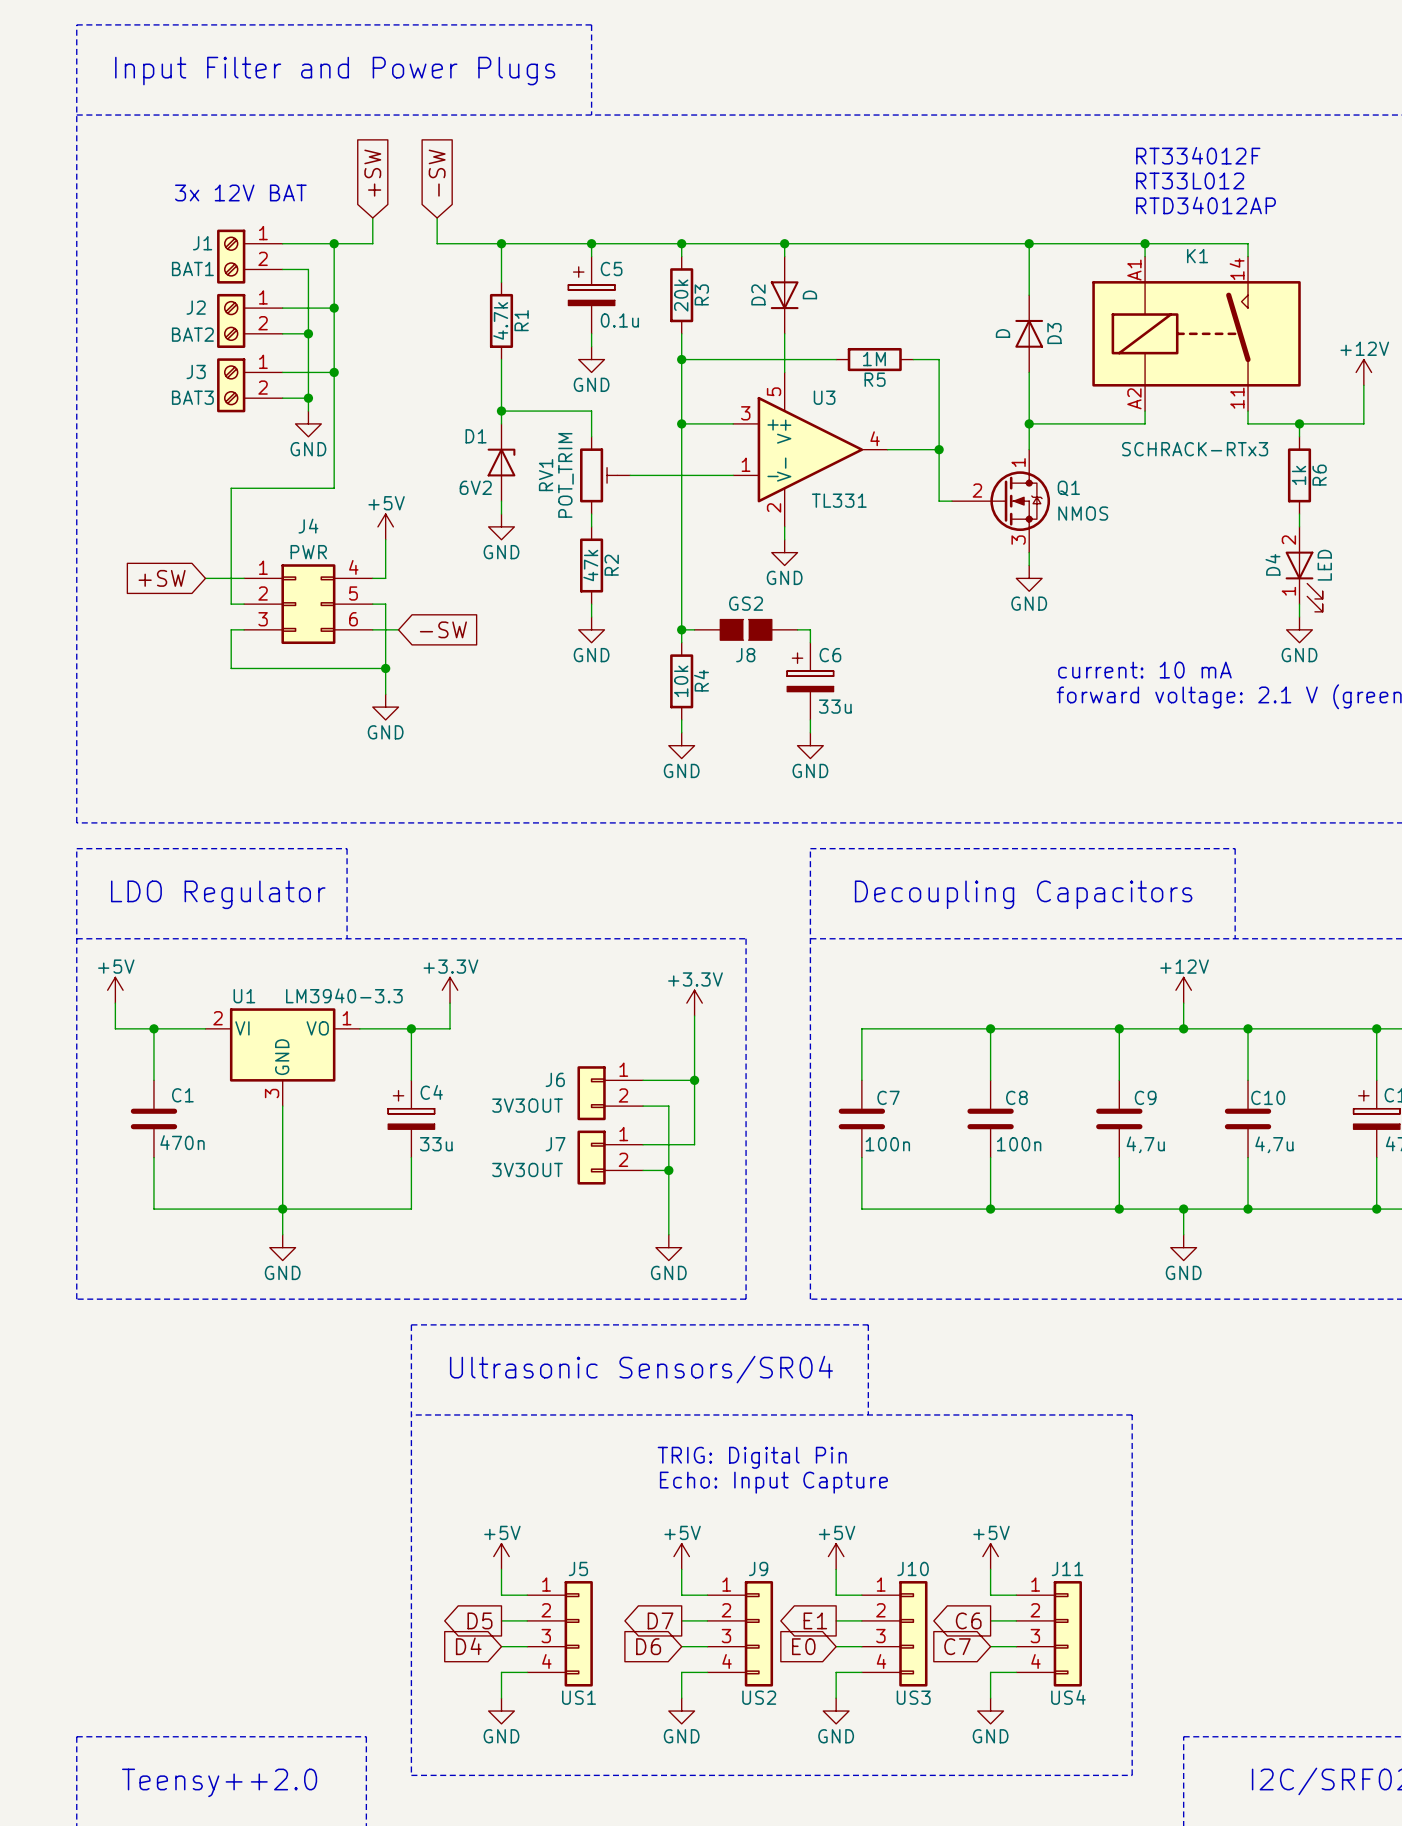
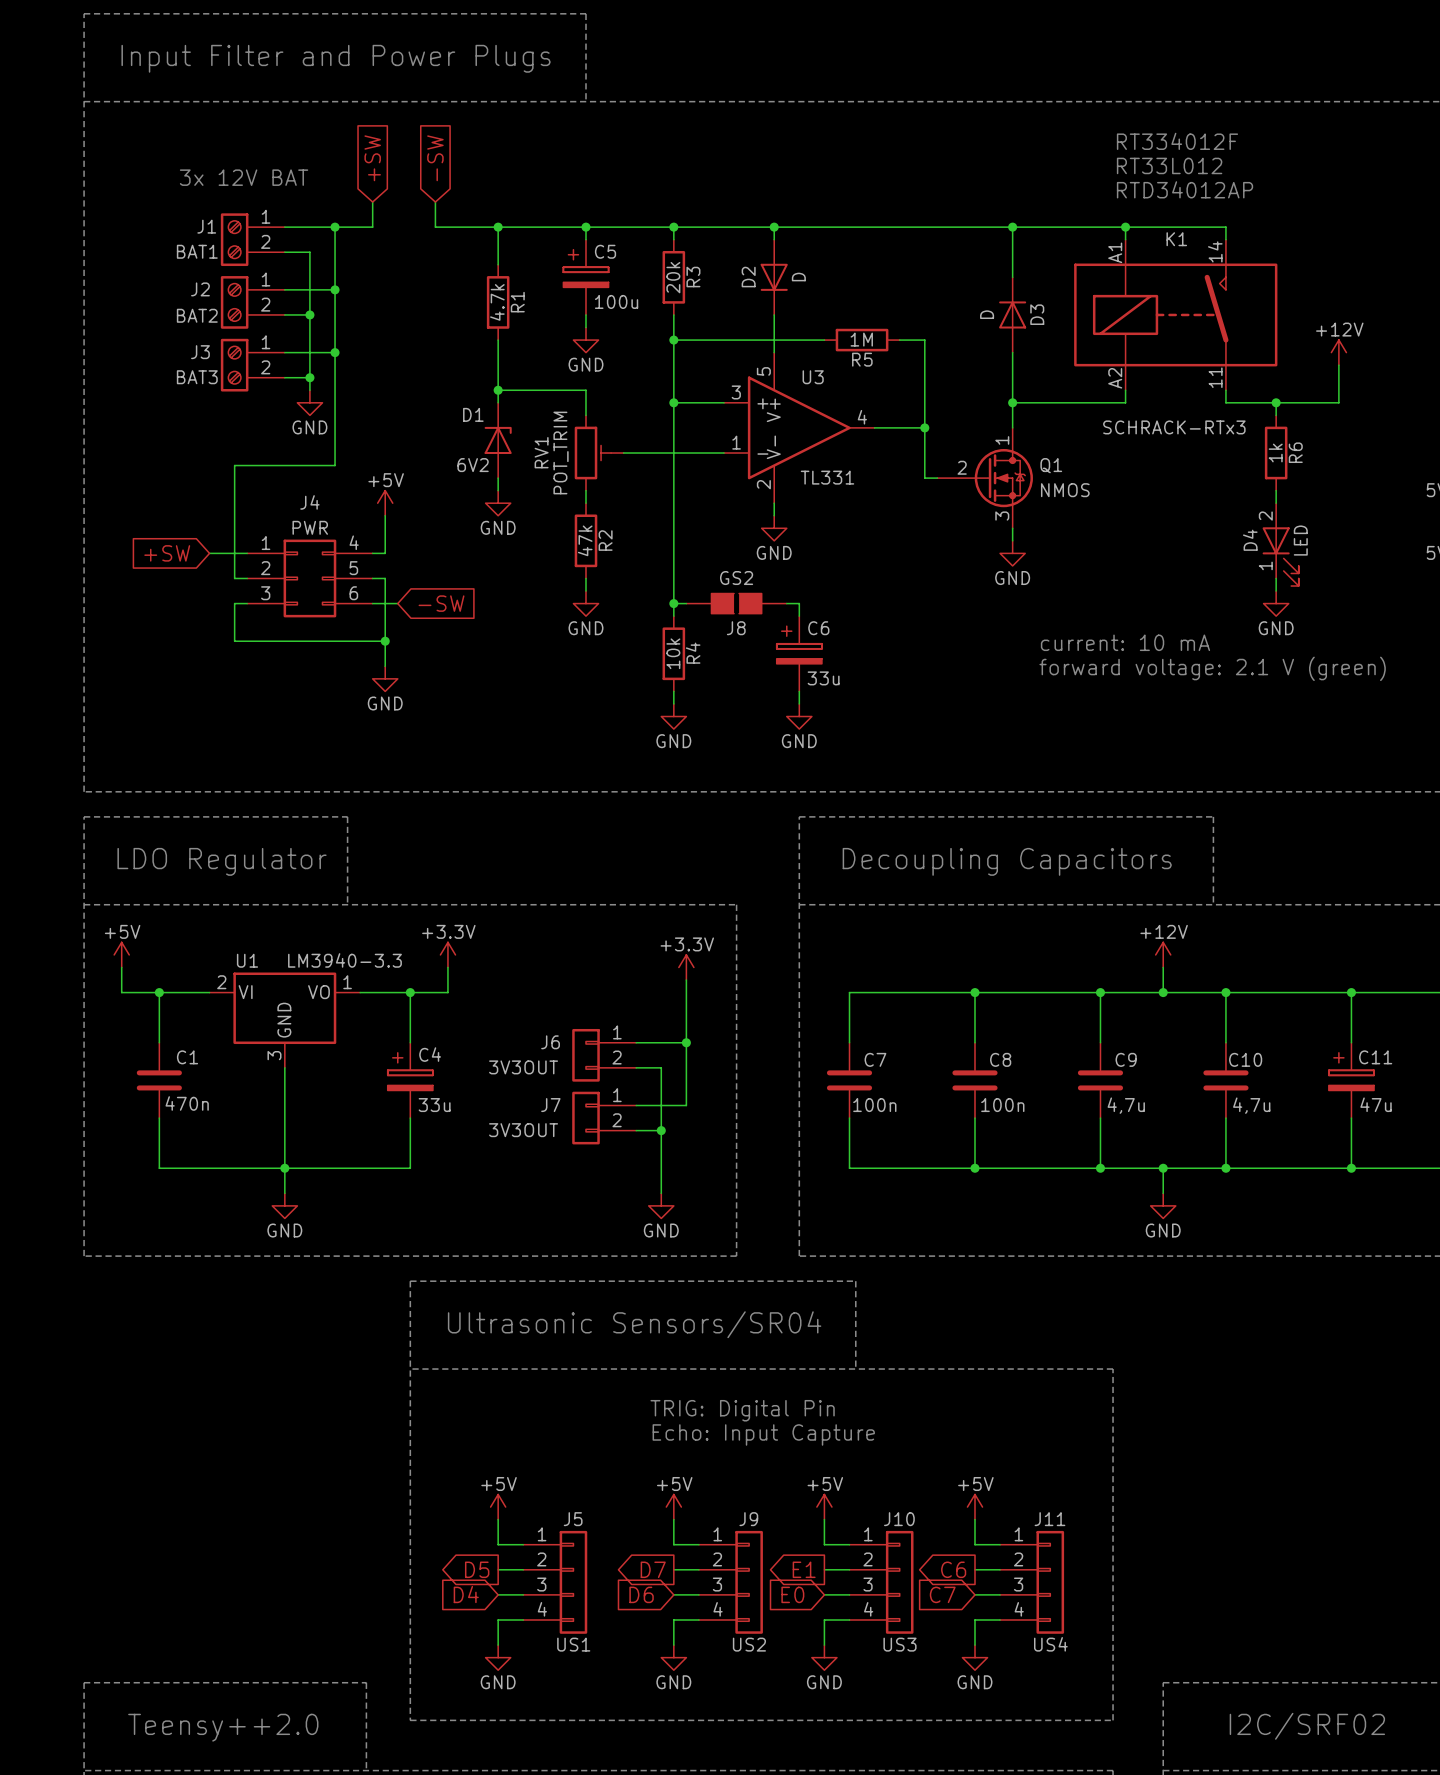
C5 value: 0.1u (619, 320) -> 100u (616, 301)

